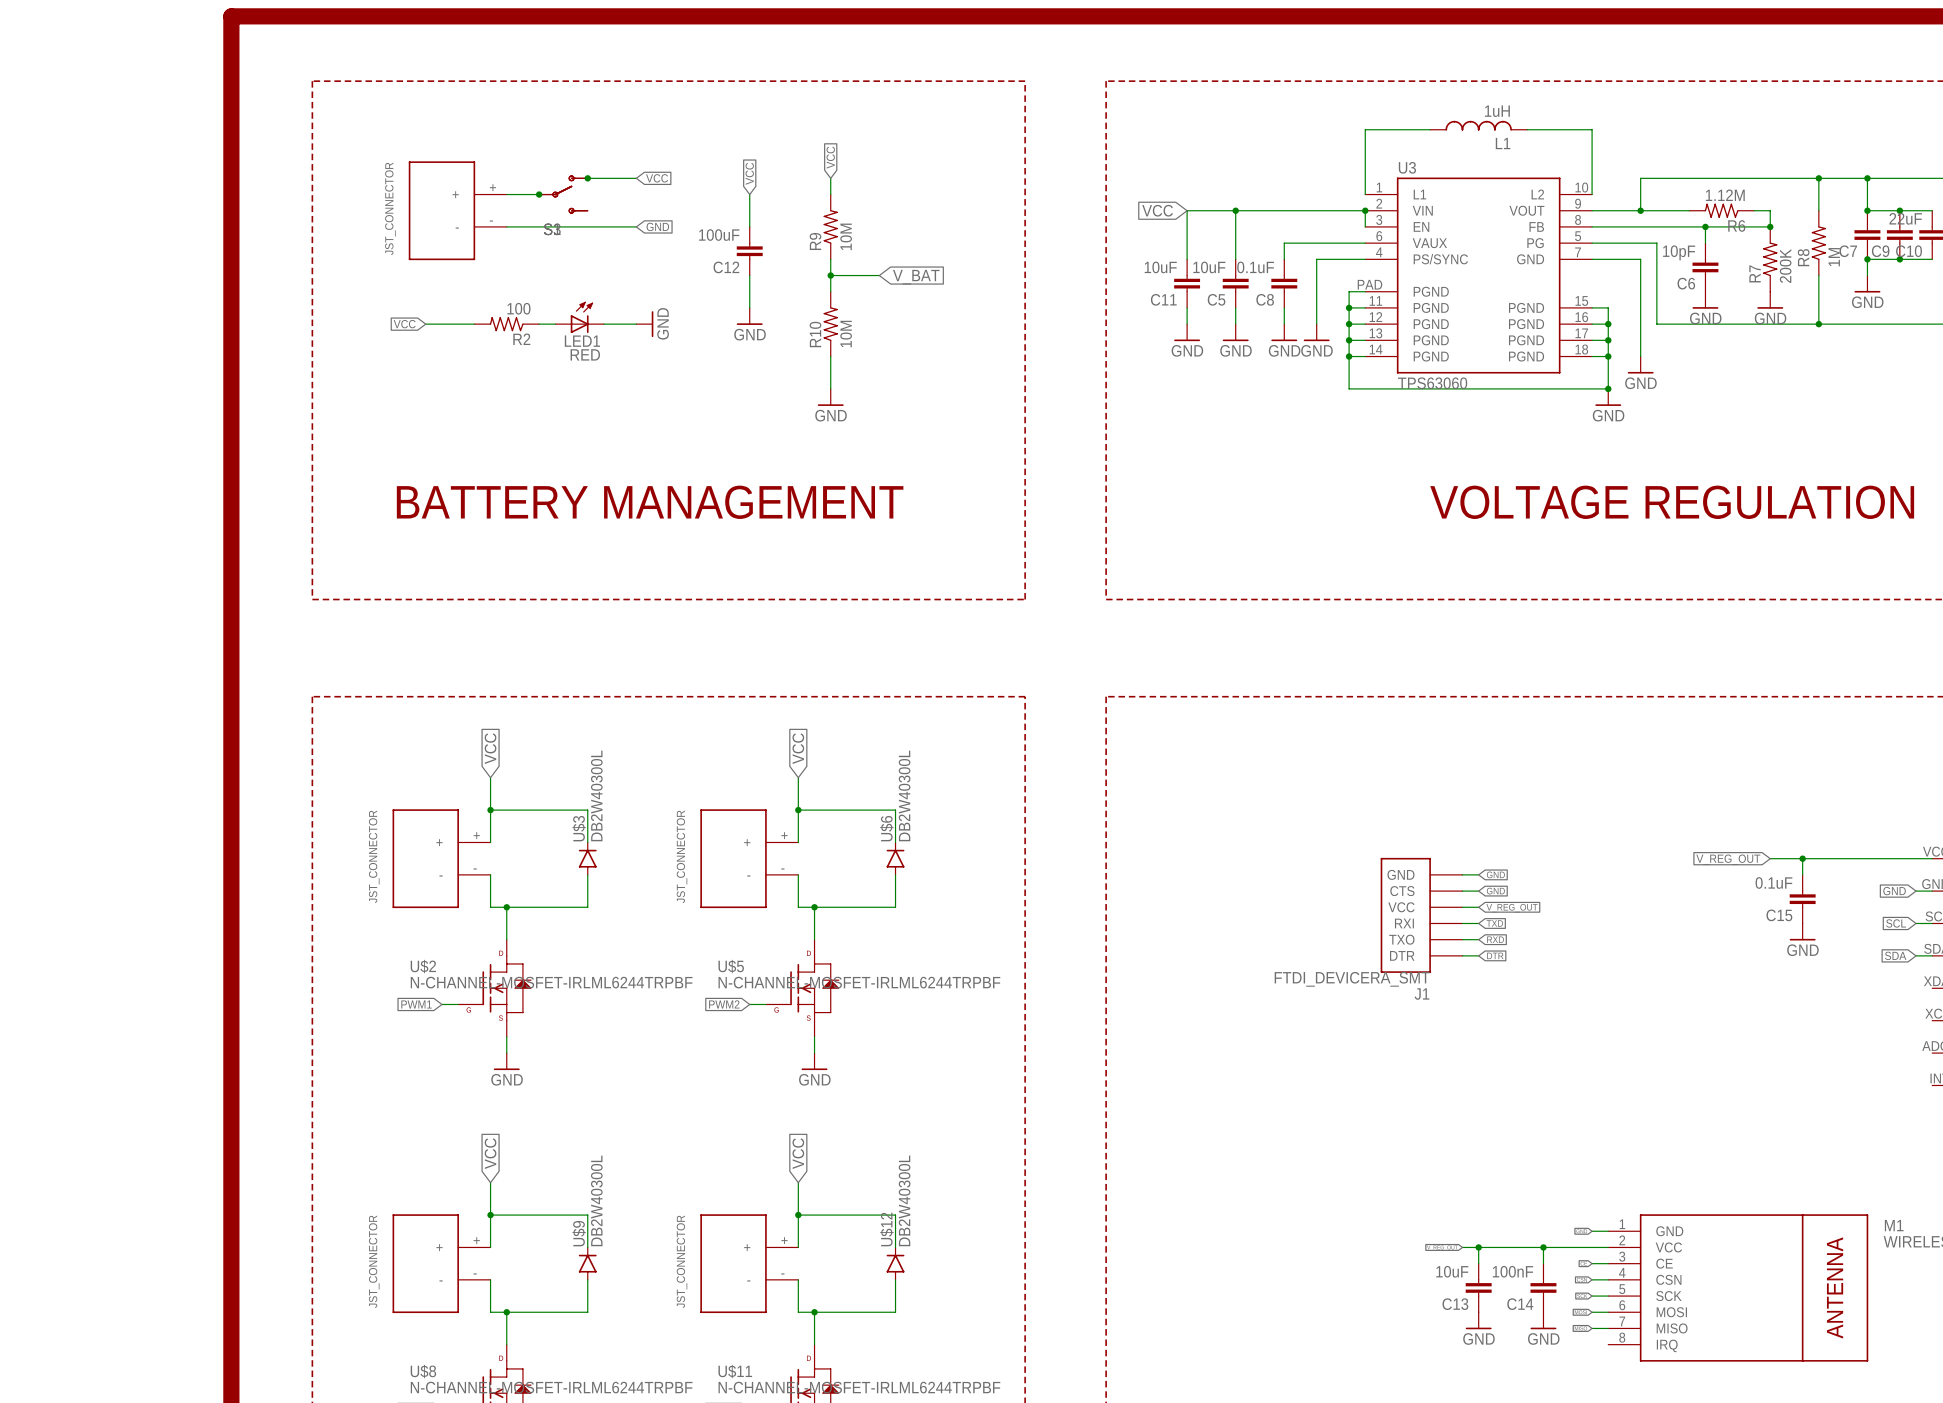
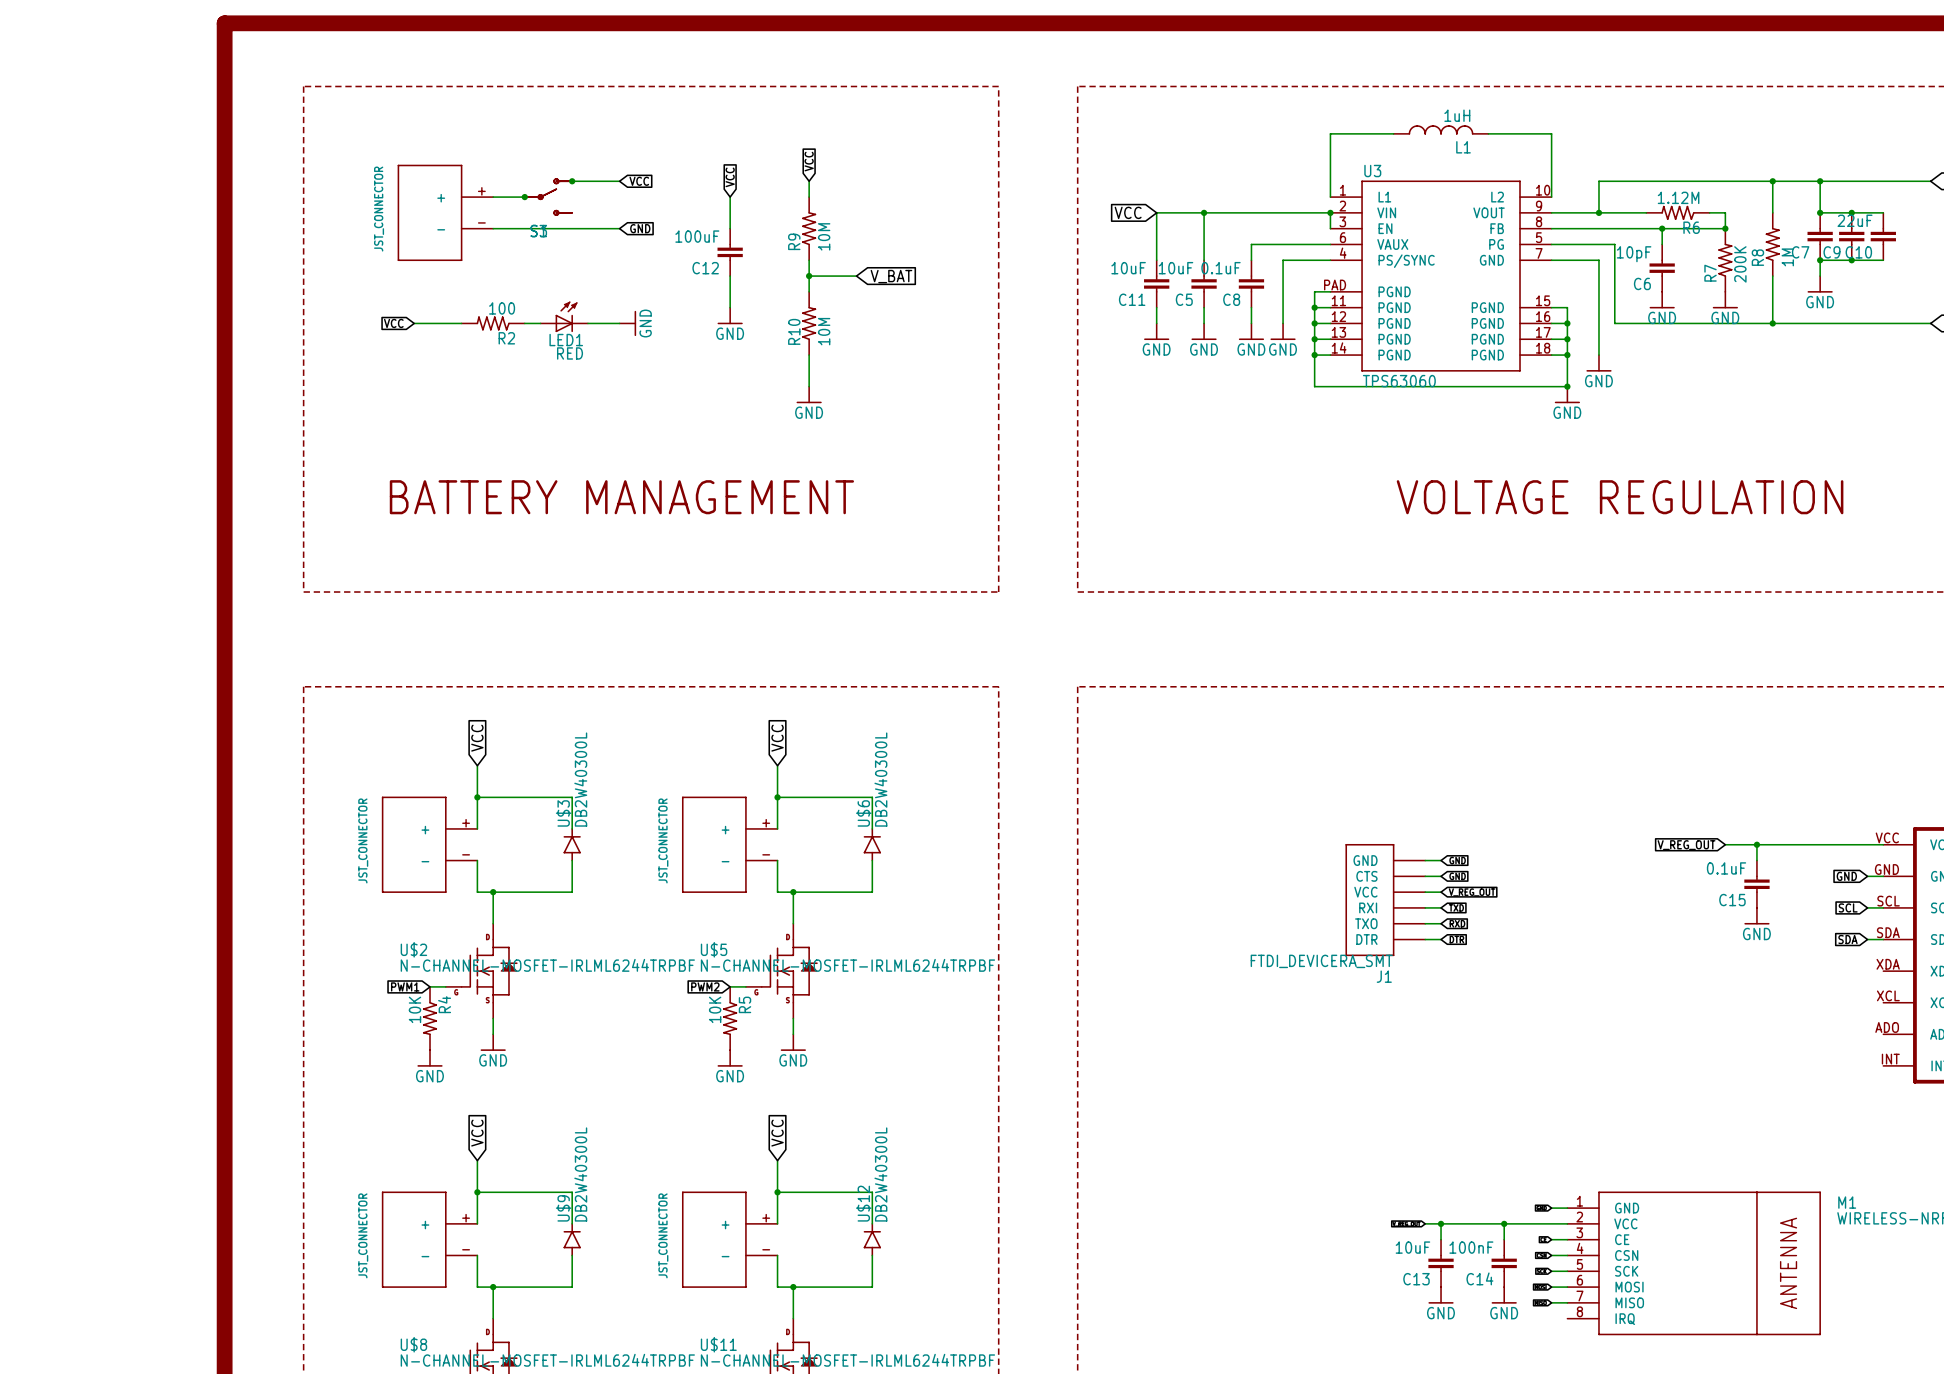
R4: none -> 10K (430, 1018)
R5: none -> 10K (730, 1018)
power symbol: none -> GND (430, 1058)
power symbol: none -> GND (730, 1058)

